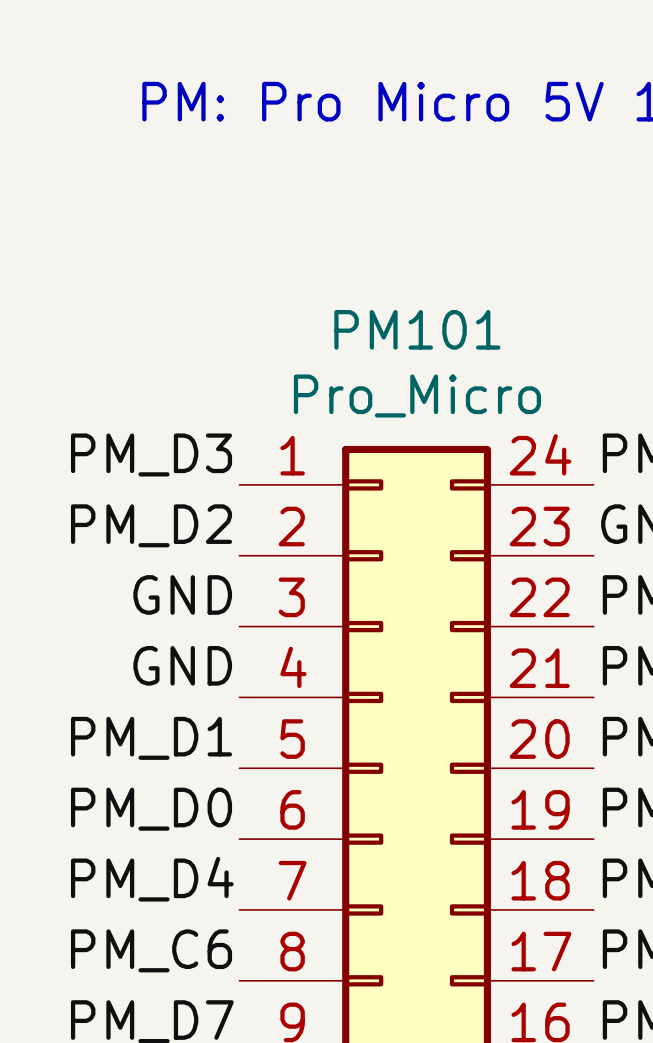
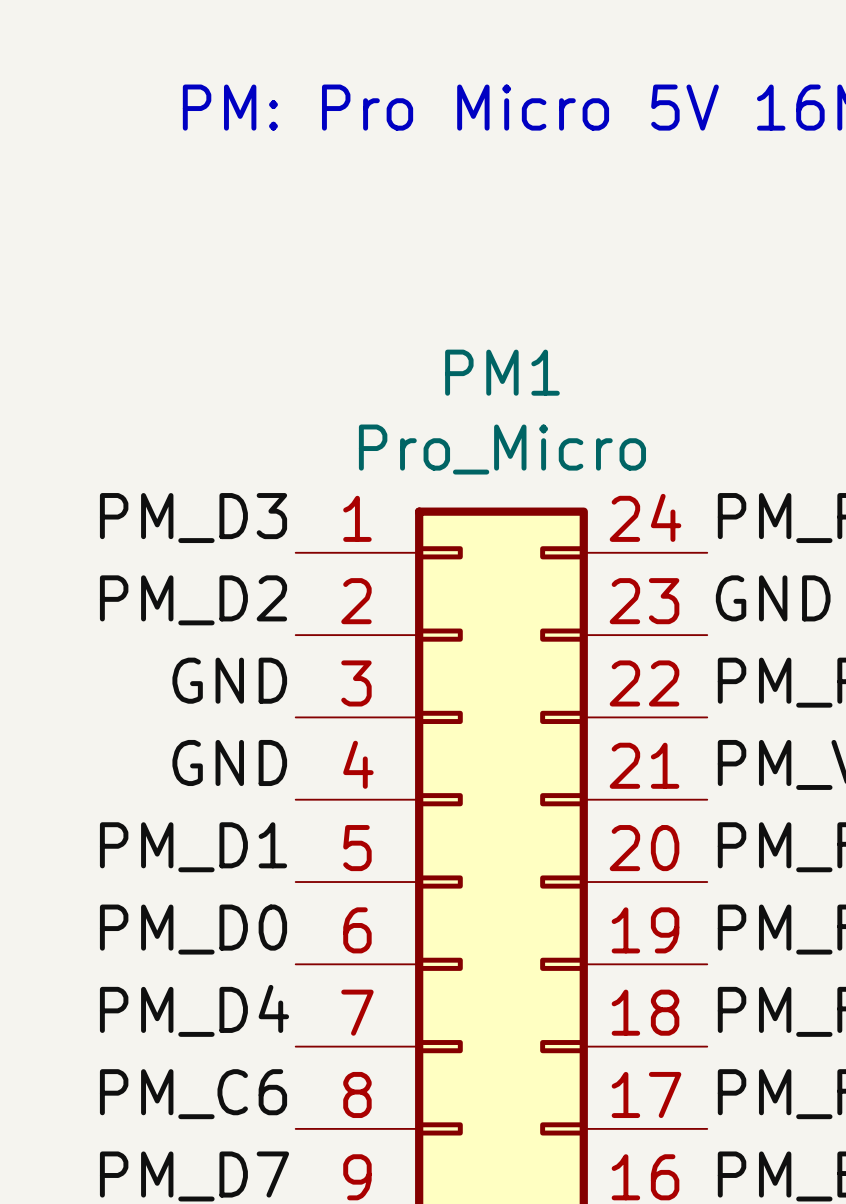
PM101 name: PM101 (417, 329) -> PM1 (502, 372)

